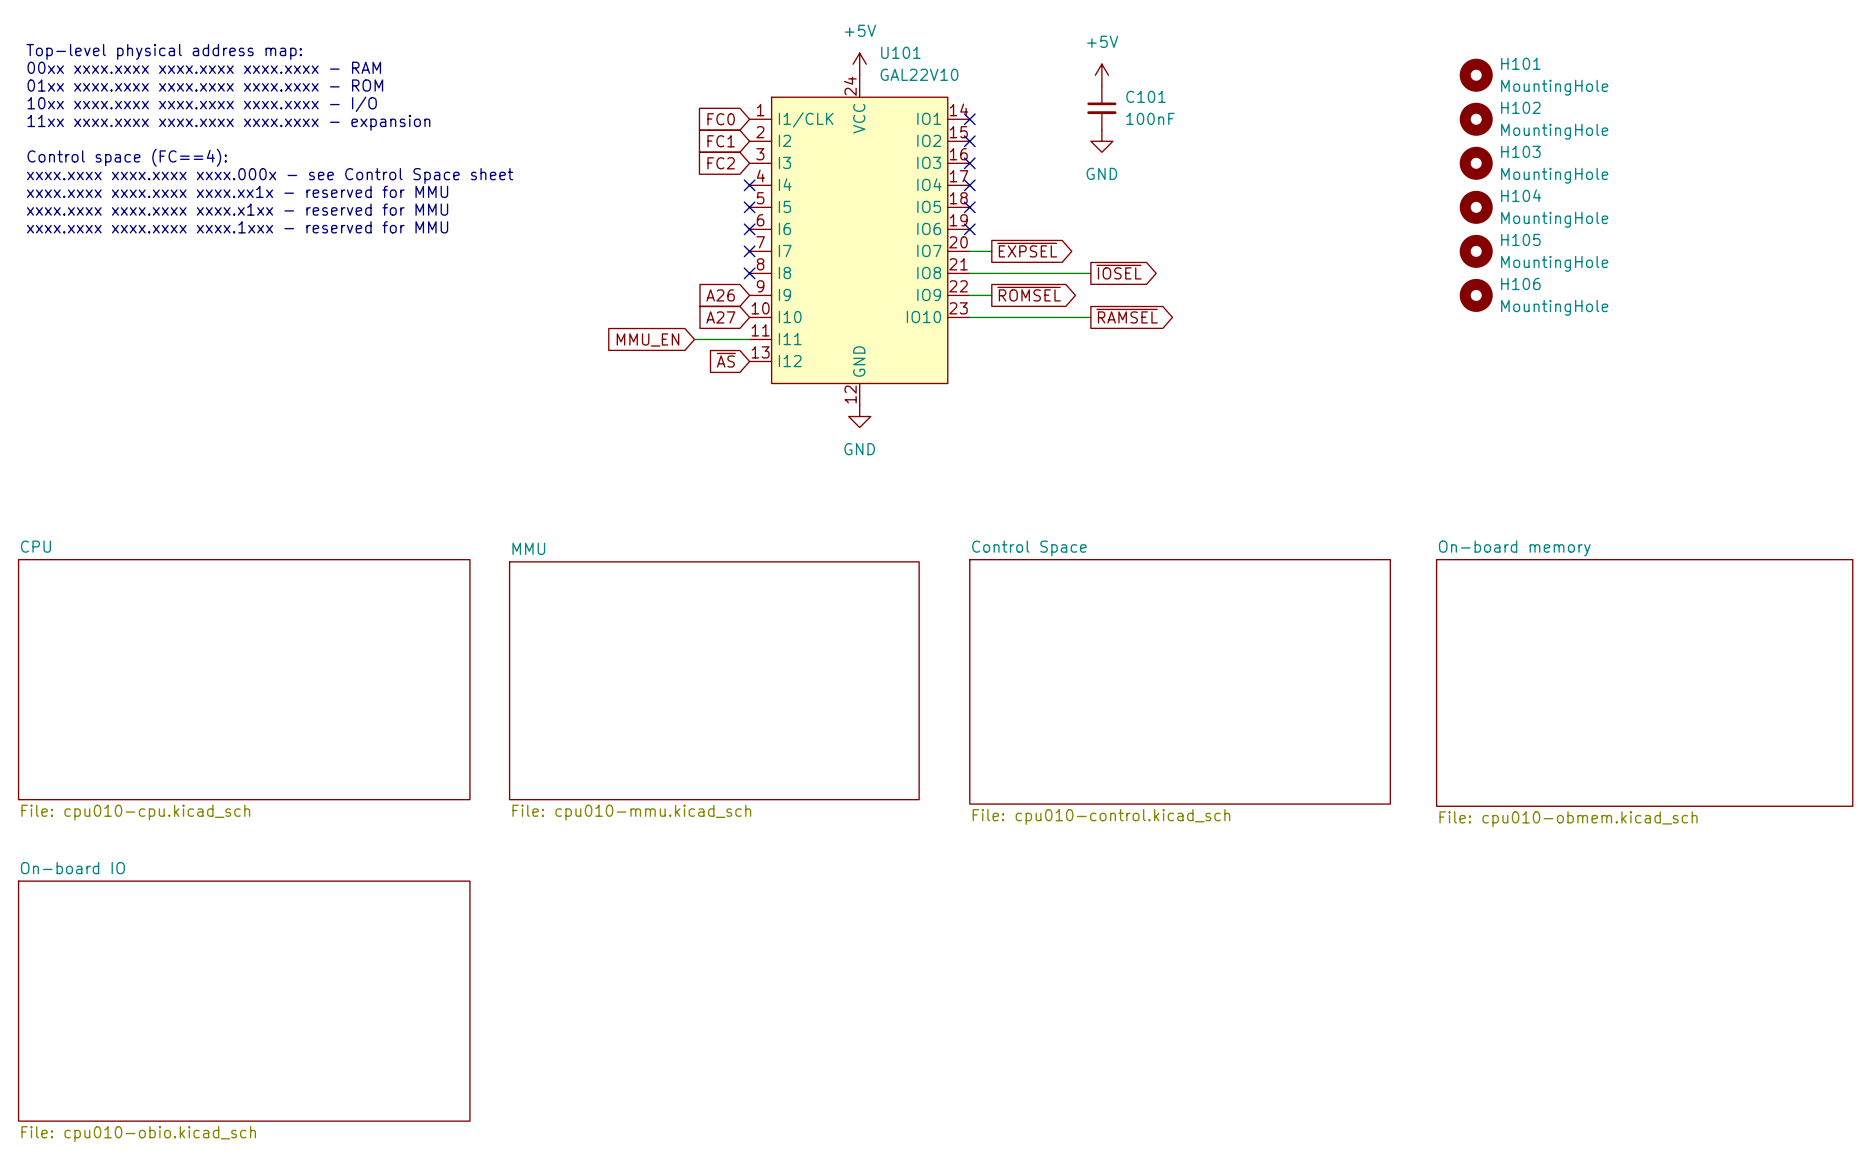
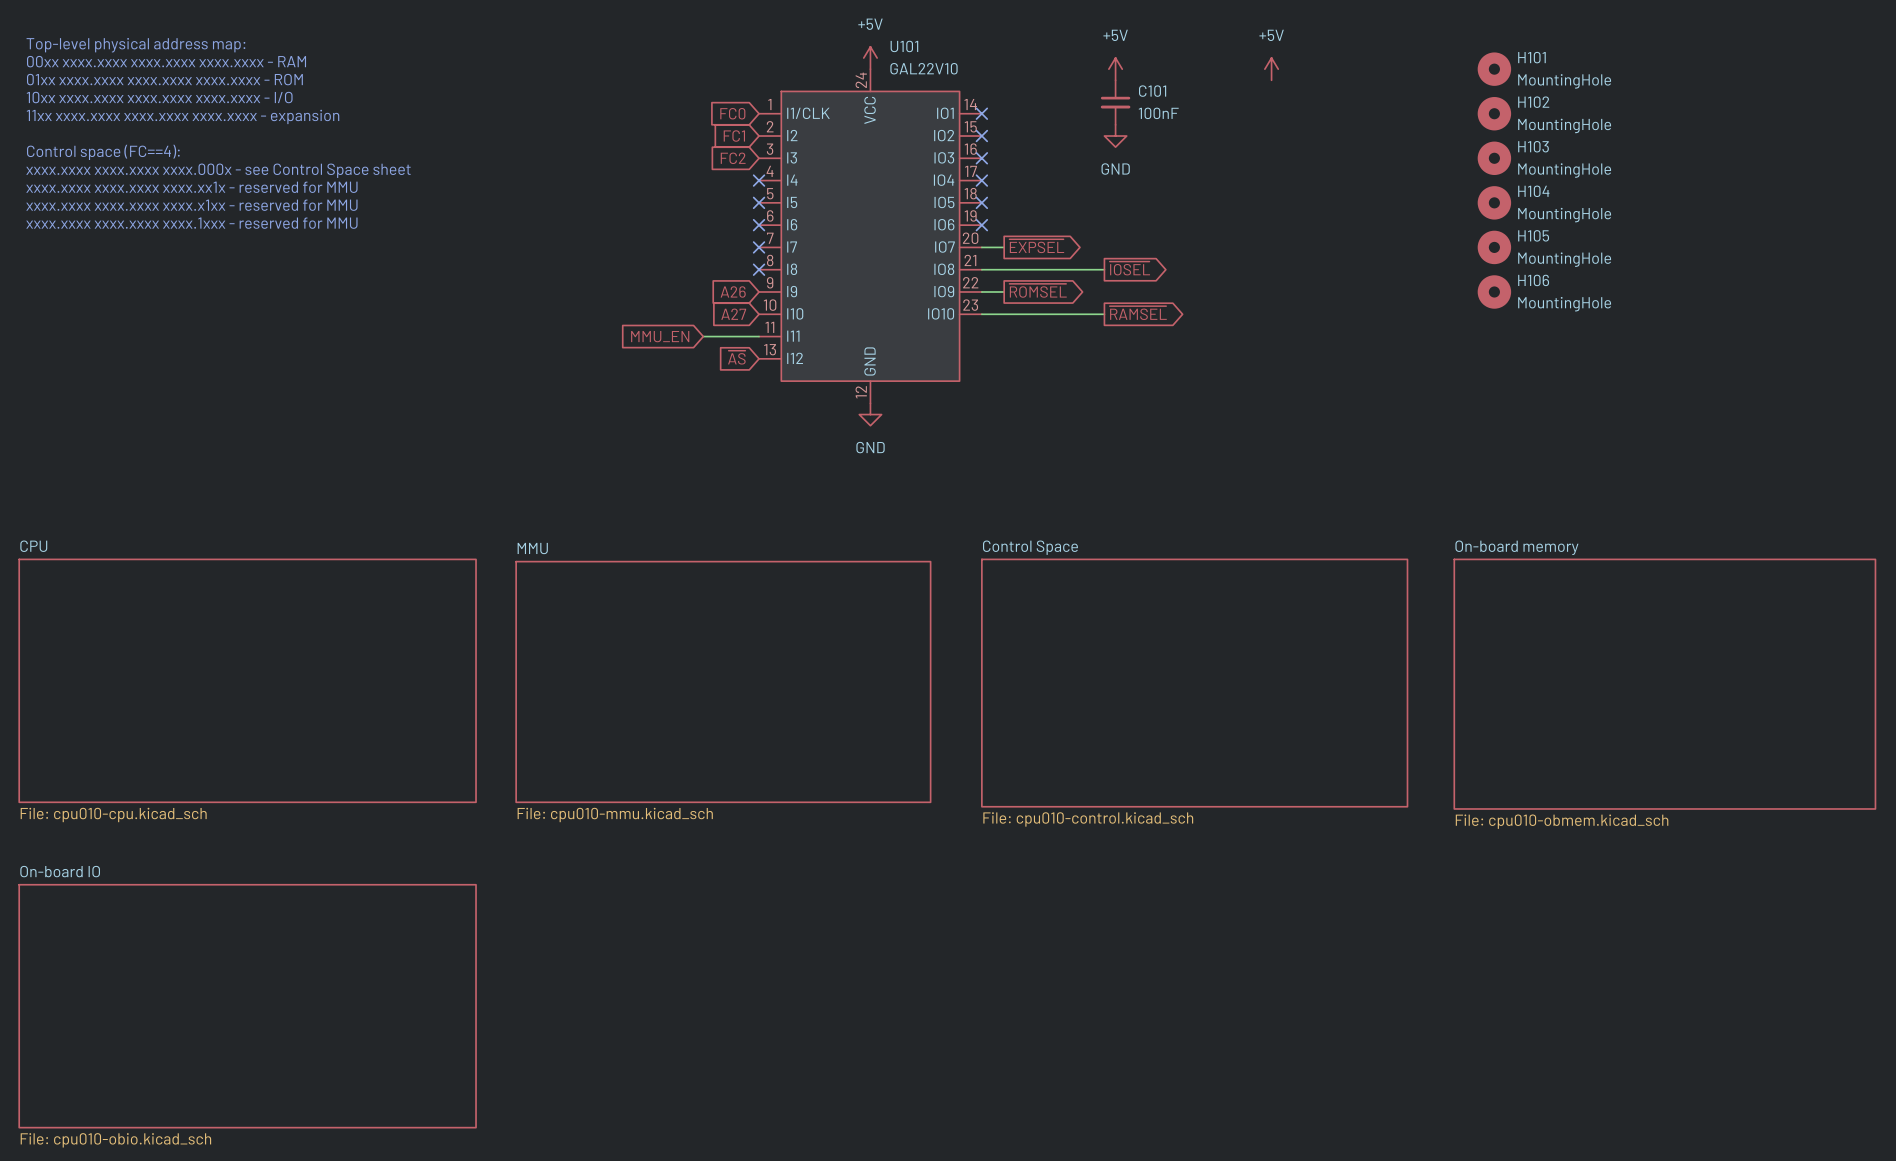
power symbol: none -> +5V (1271, 69)

